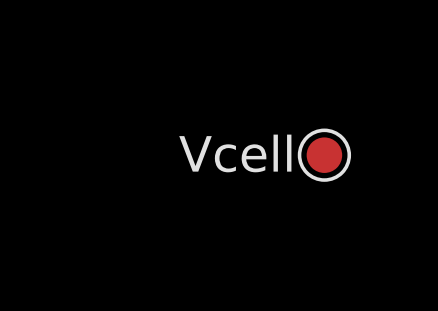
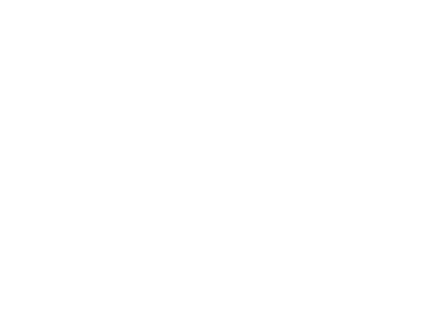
part: Vcell (324, 155) -> none

